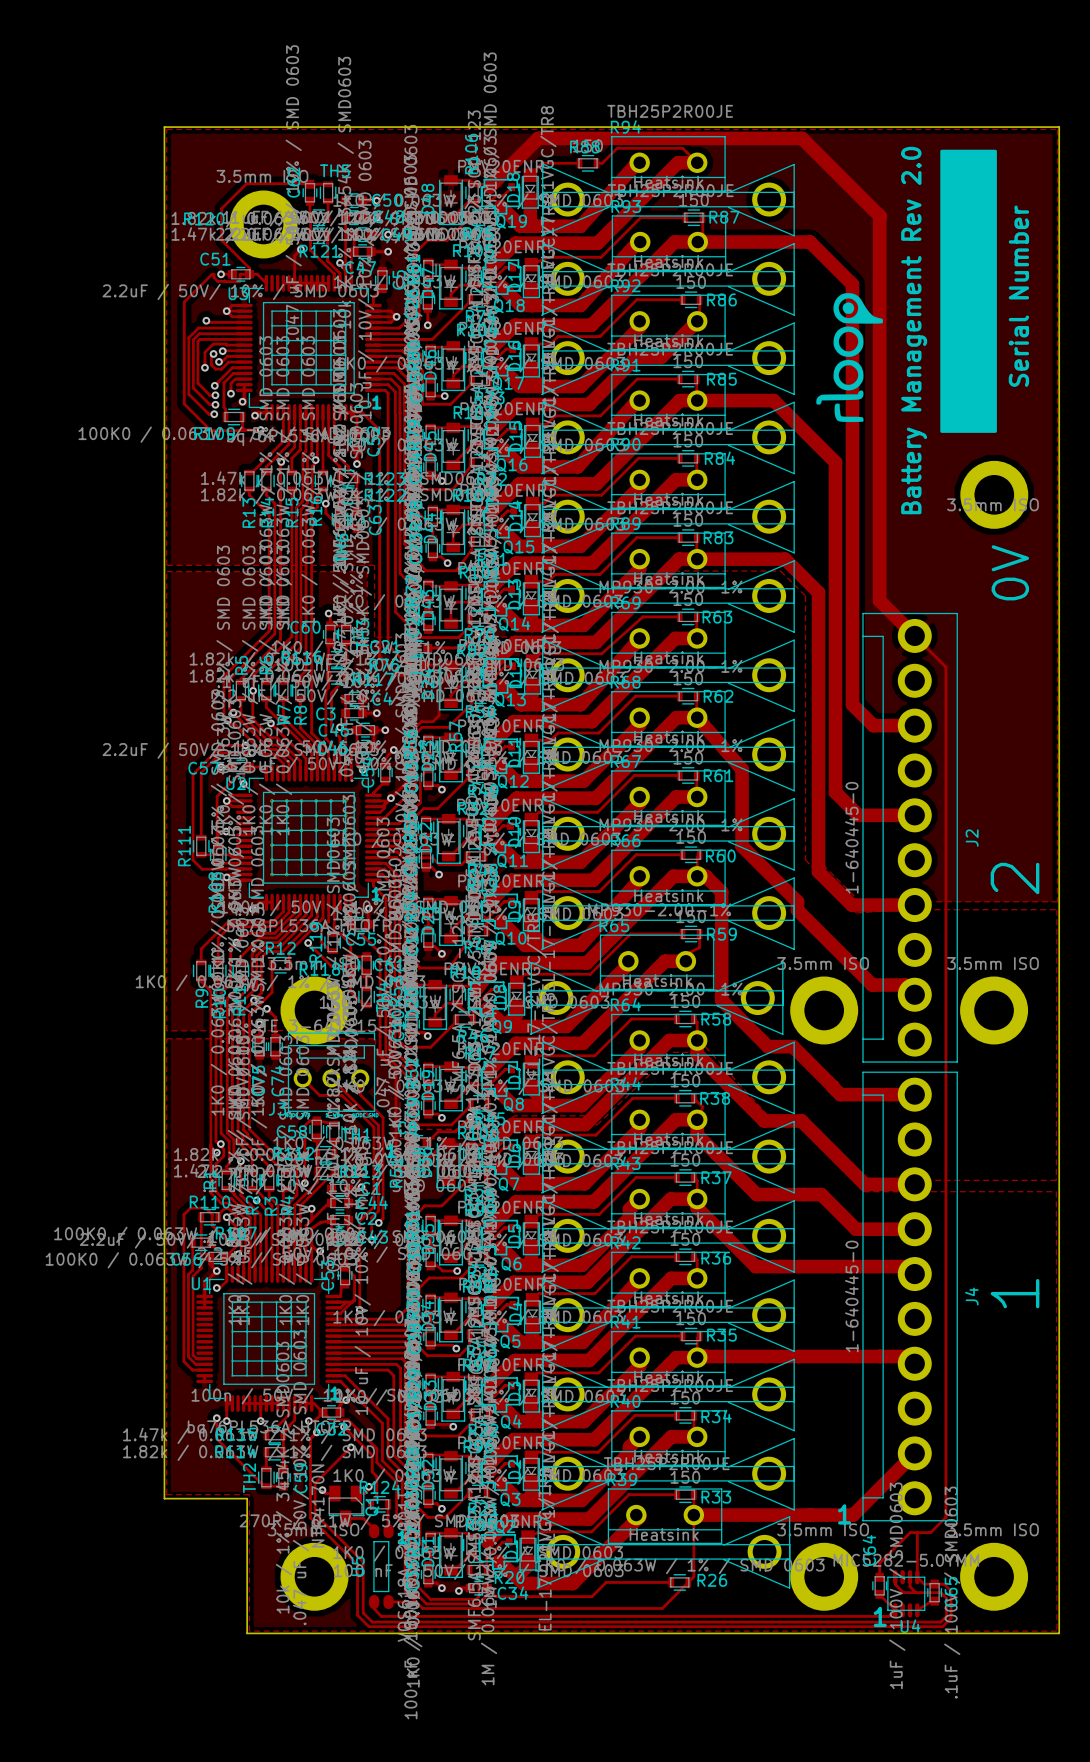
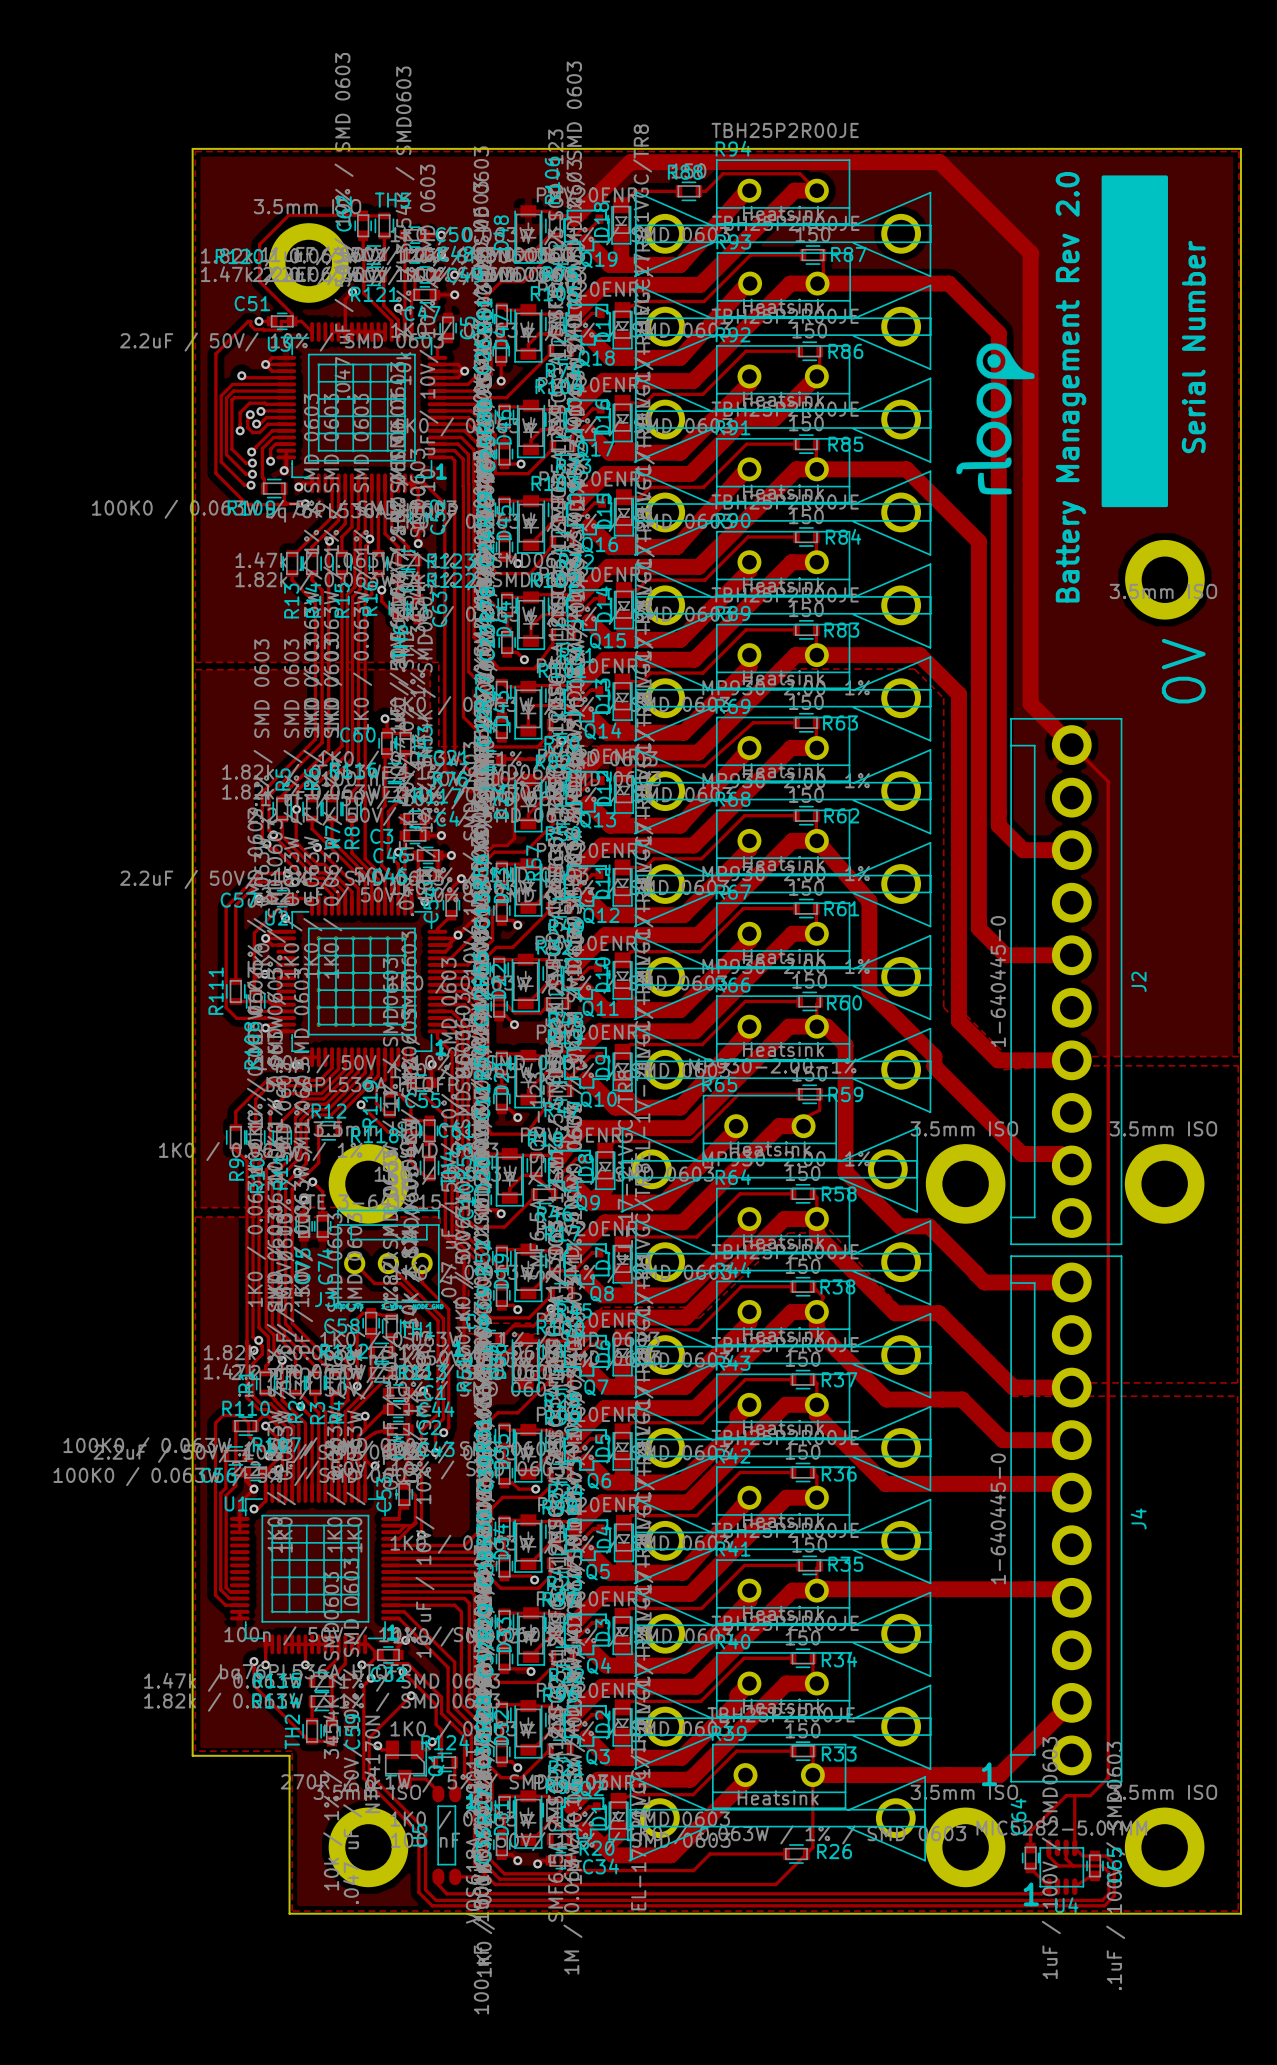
text: 2 (1015, 878) -> none
text: 1 (1015, 1293) -> none

